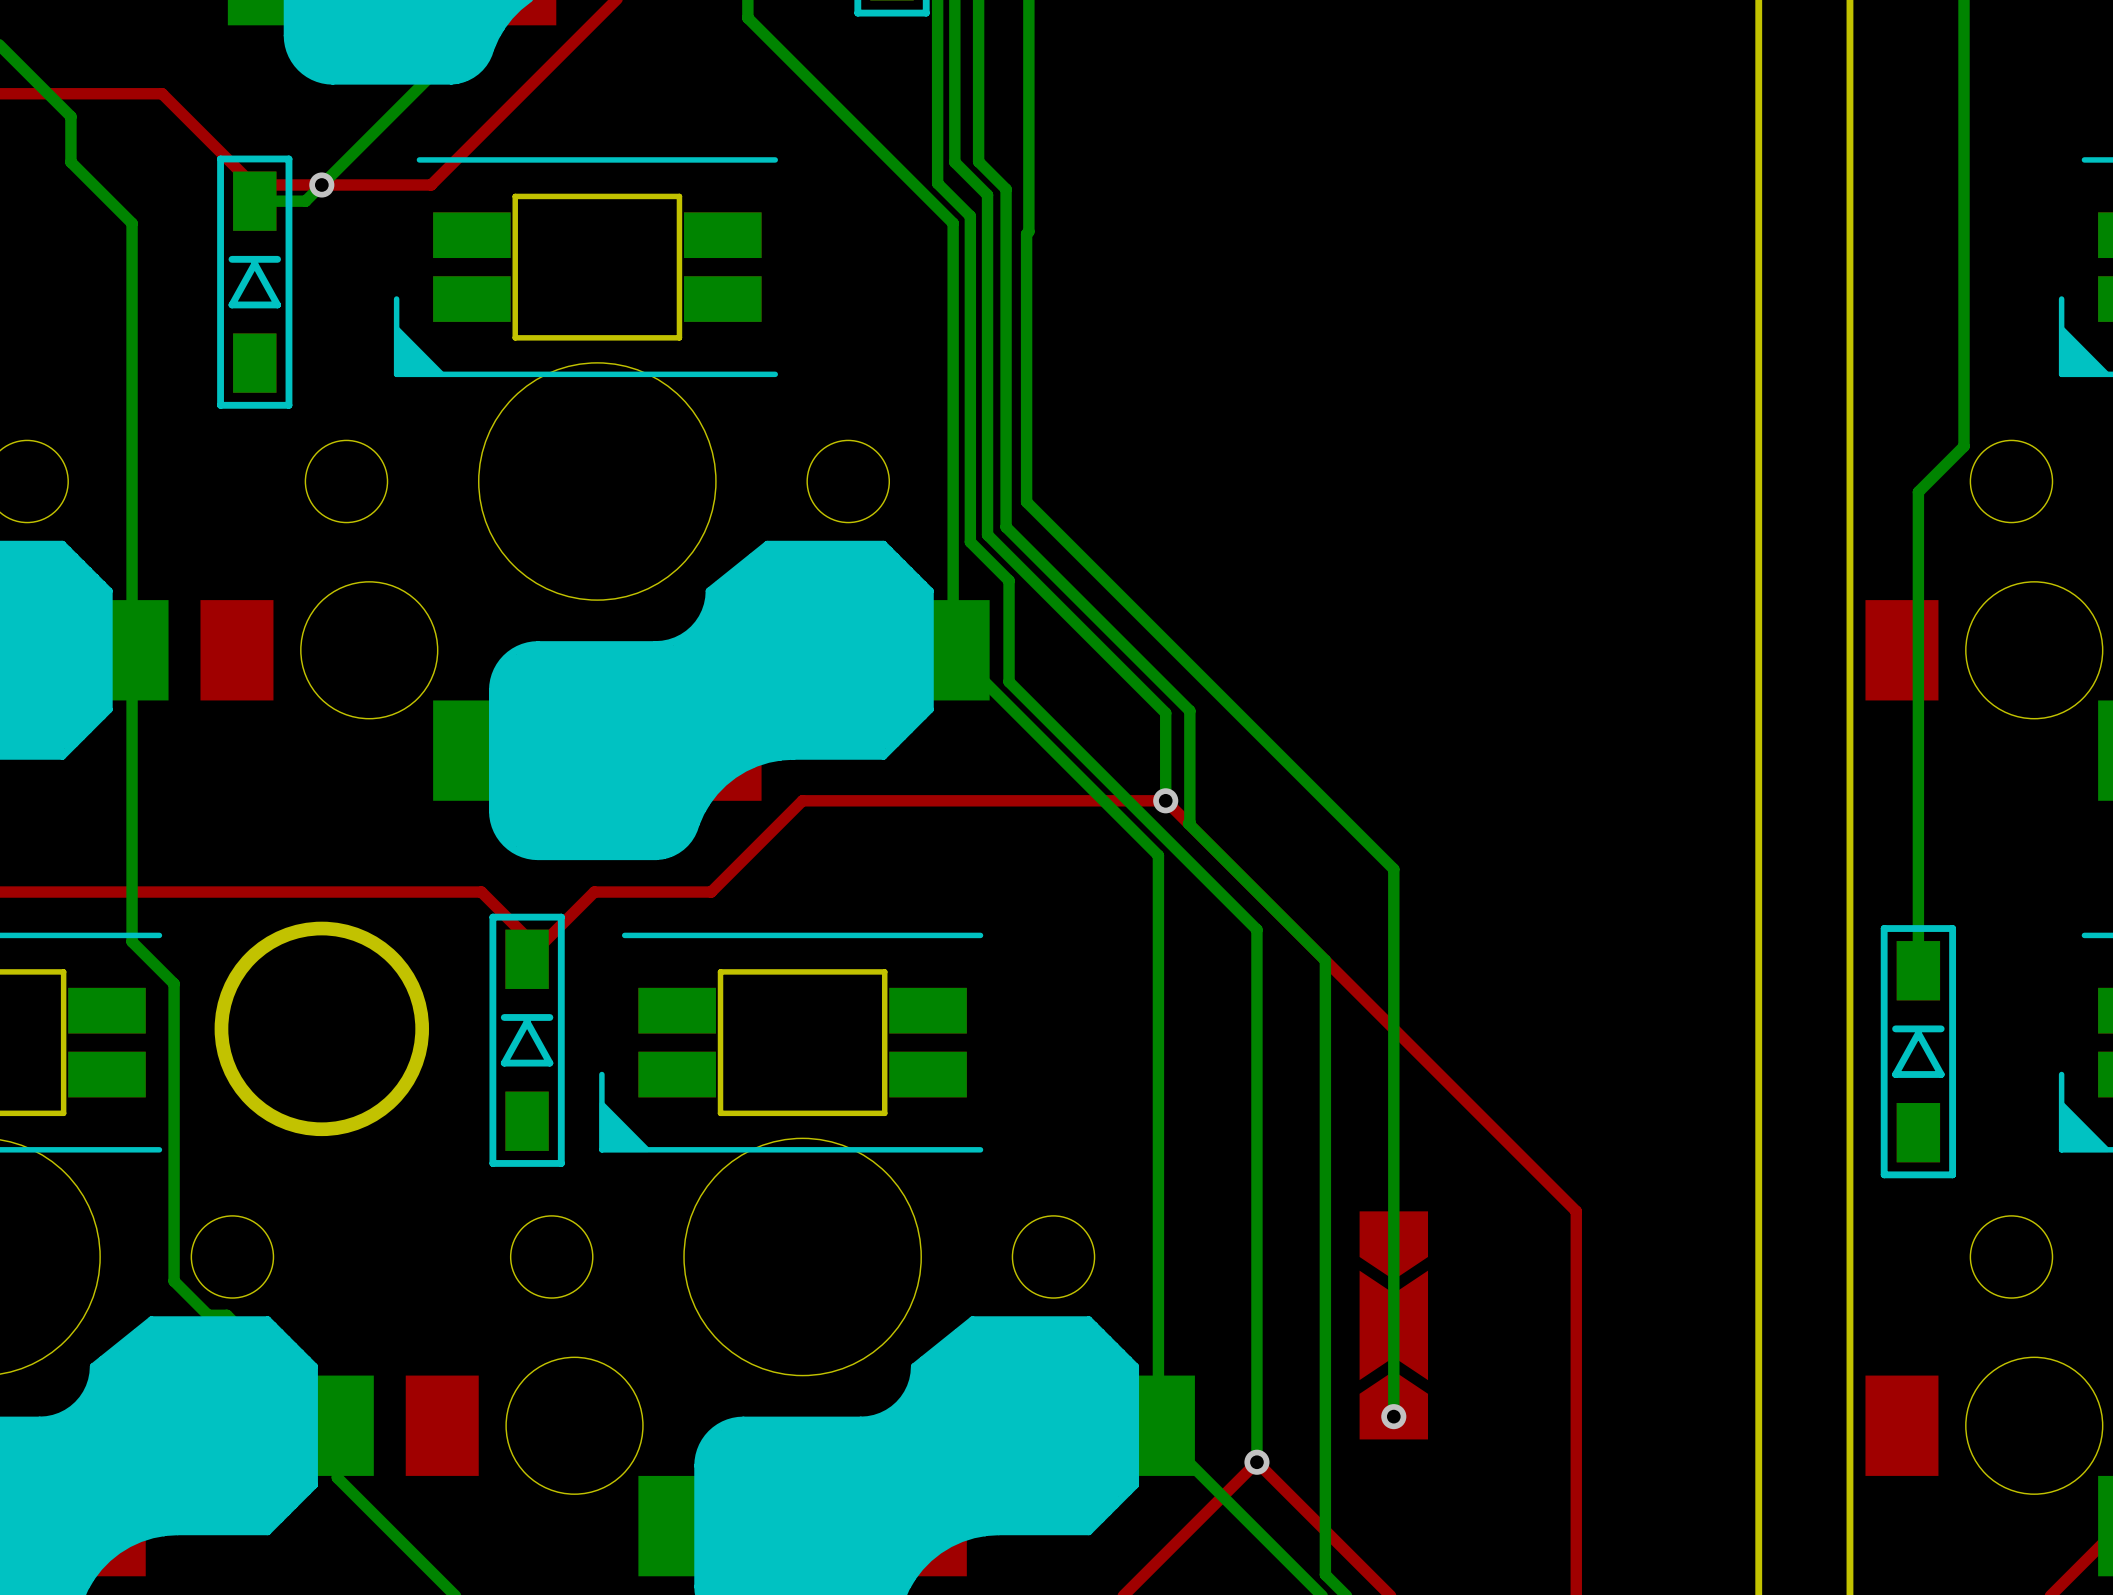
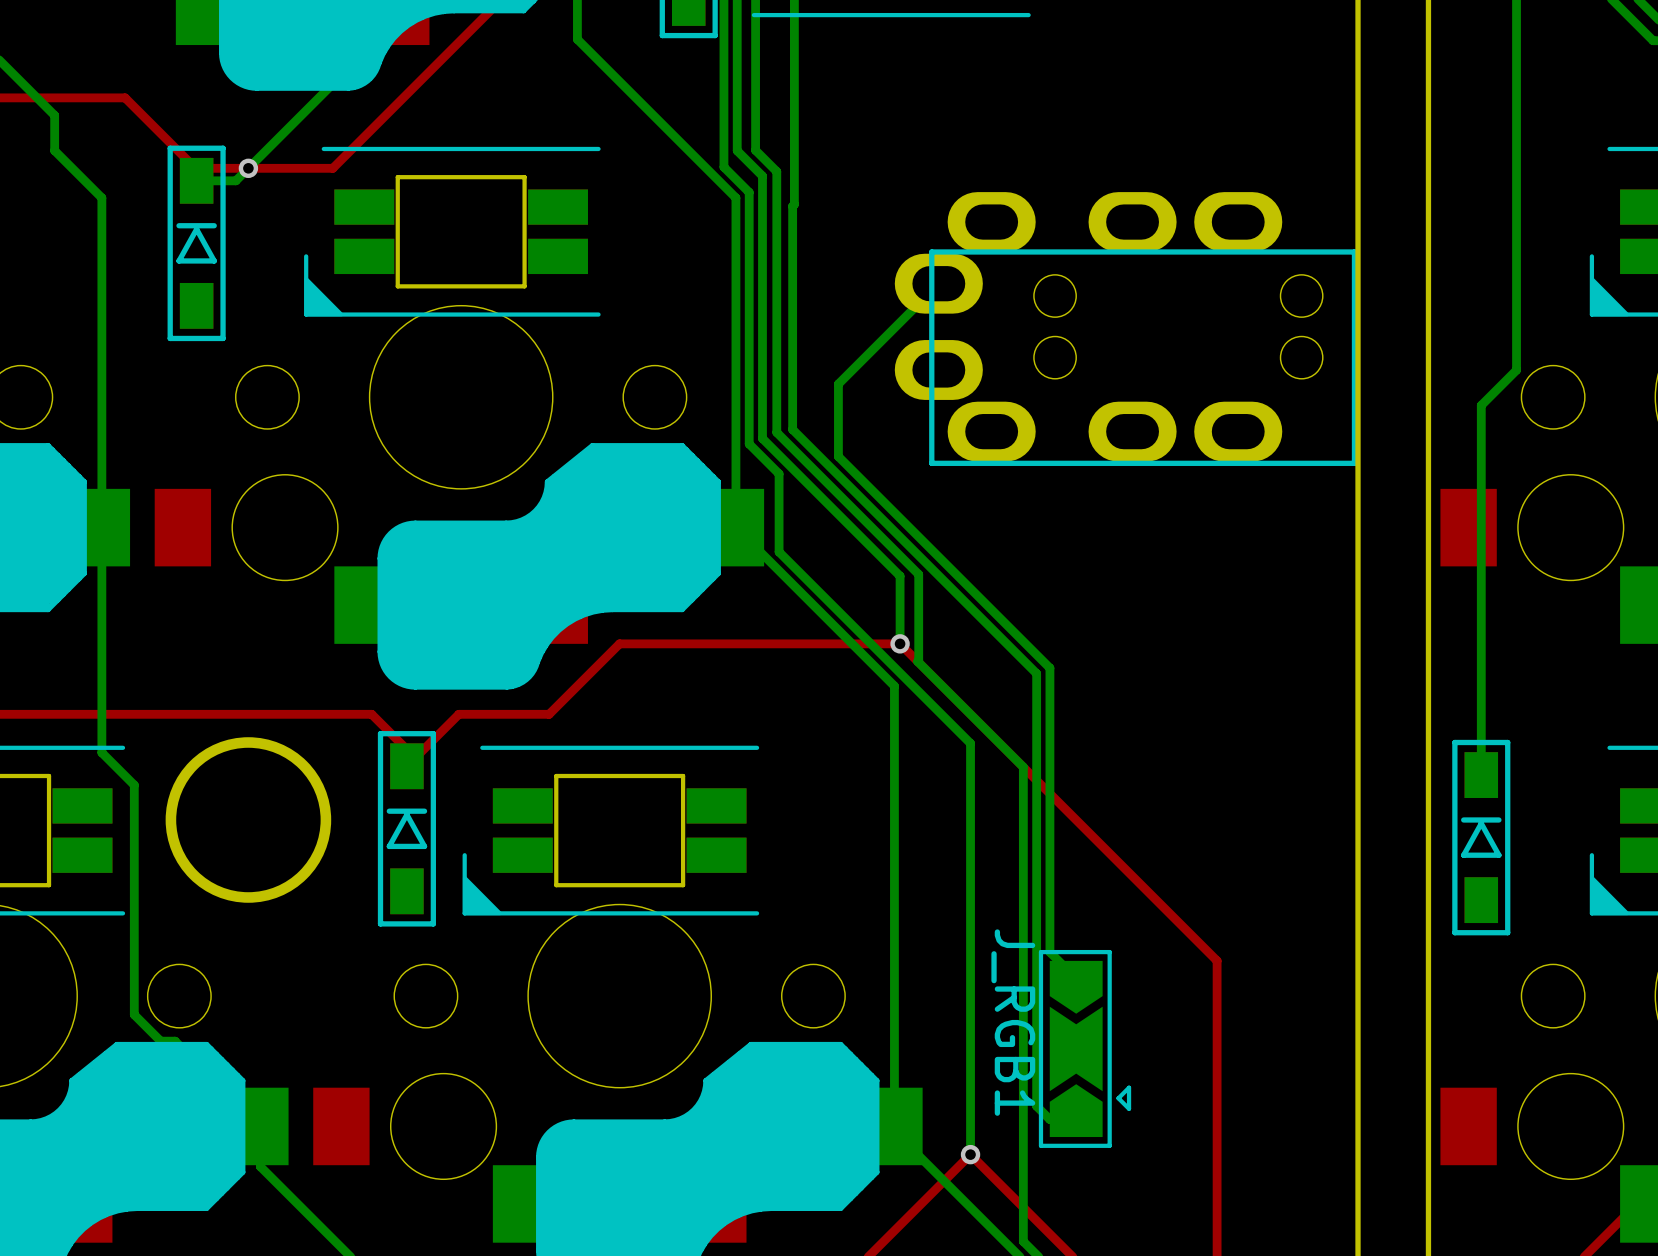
bottom track: none -> (938, 283) (838, 384) (838, 456) (1049, 668) (1049, 952) (1076, 978)
part: none -> (1125, 329)
bottom track: (1026, 502) (1393, 869) (1393, 1416) -> (792, 413) (792, 429) (1036, 673) (1036, 1106) (1049, 1119) (1076, 1119)
J_RGB1 side: top (1393, 1325) -> bottom (1085, 1048)
via: (1393, 1416) -> none

